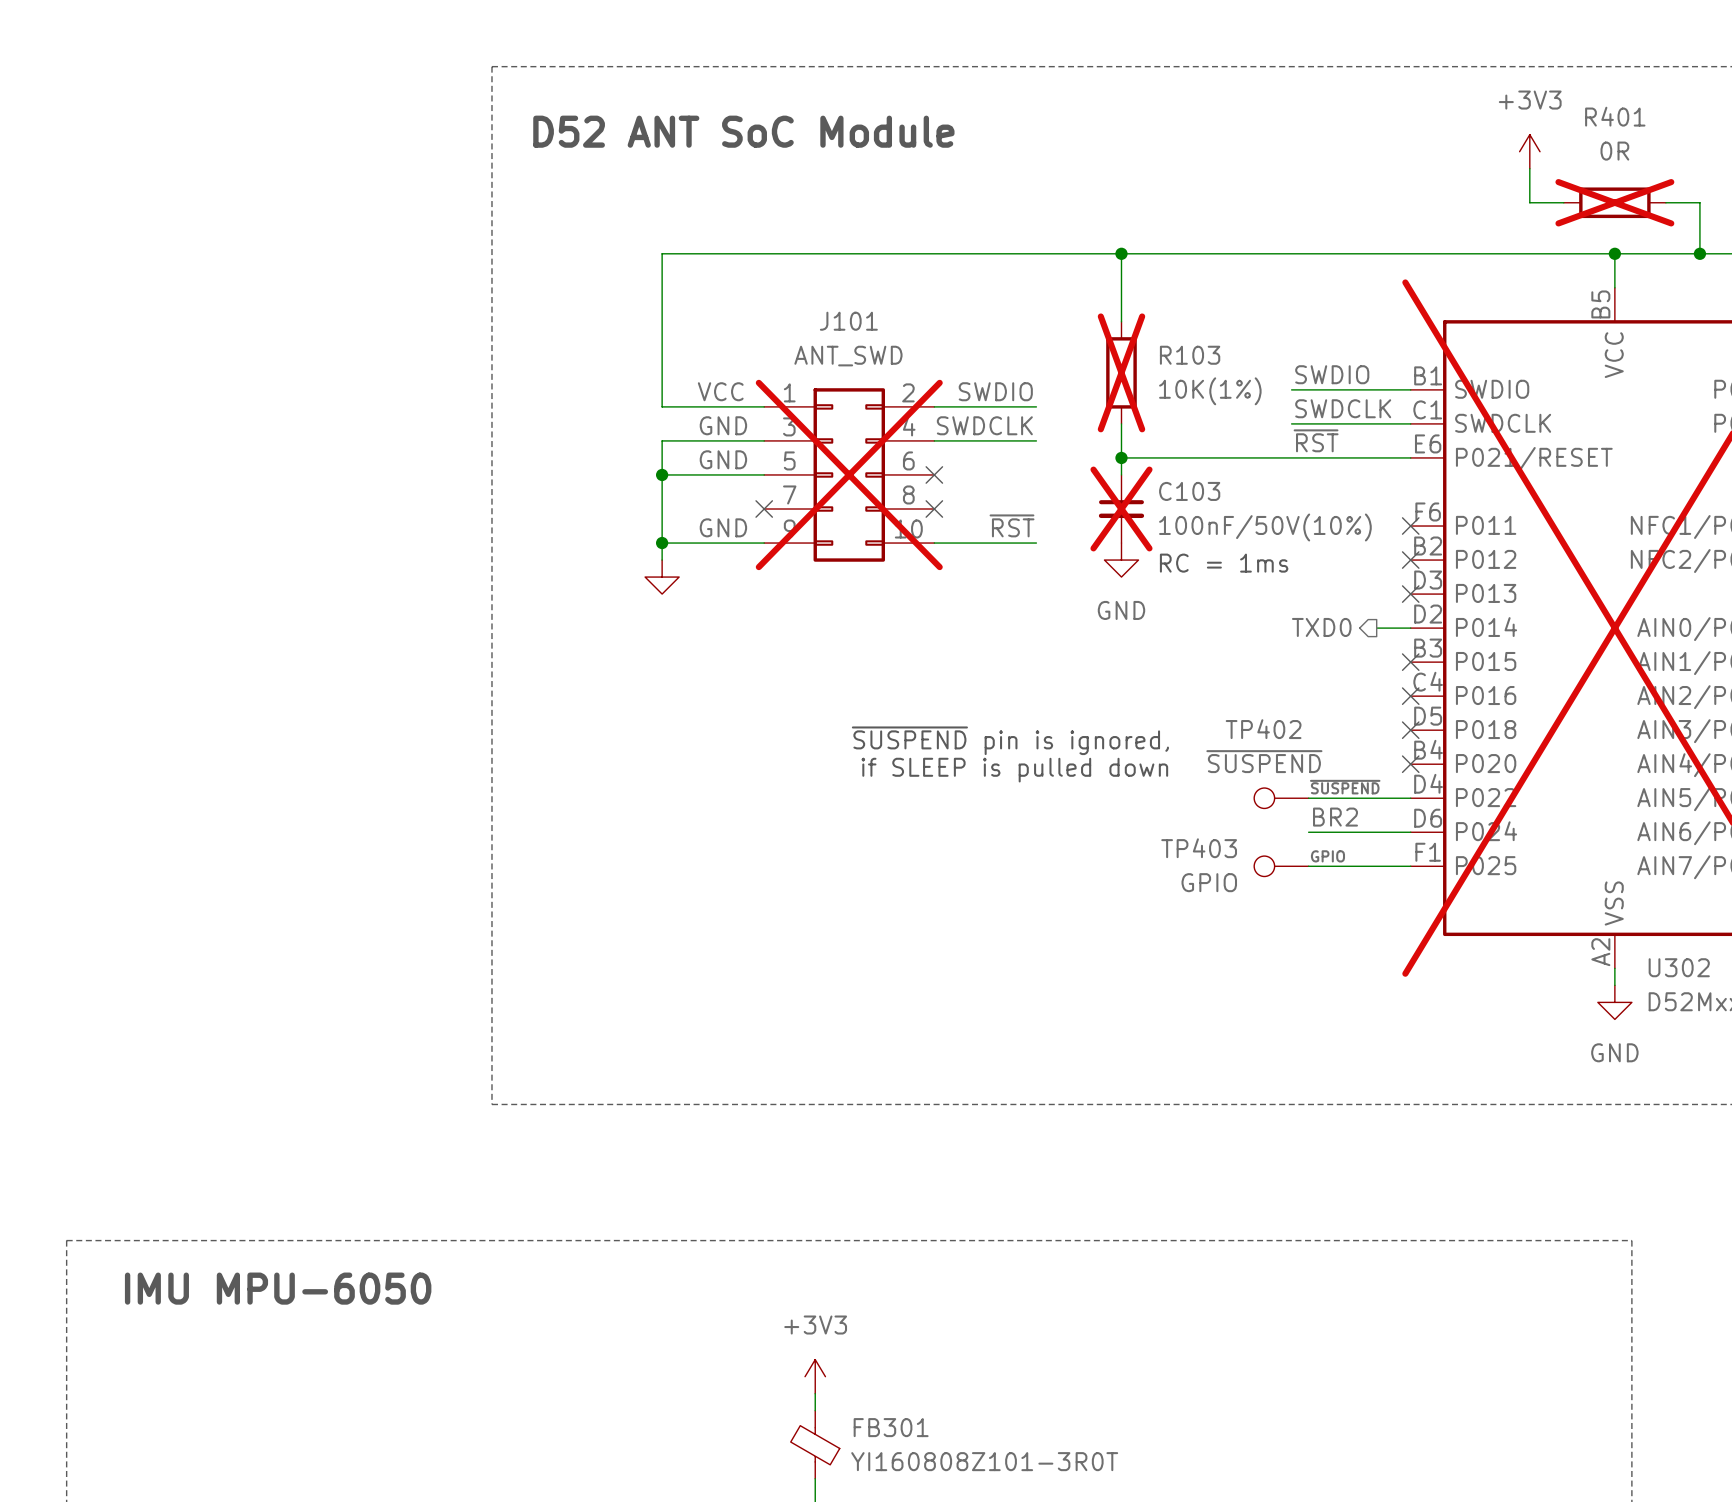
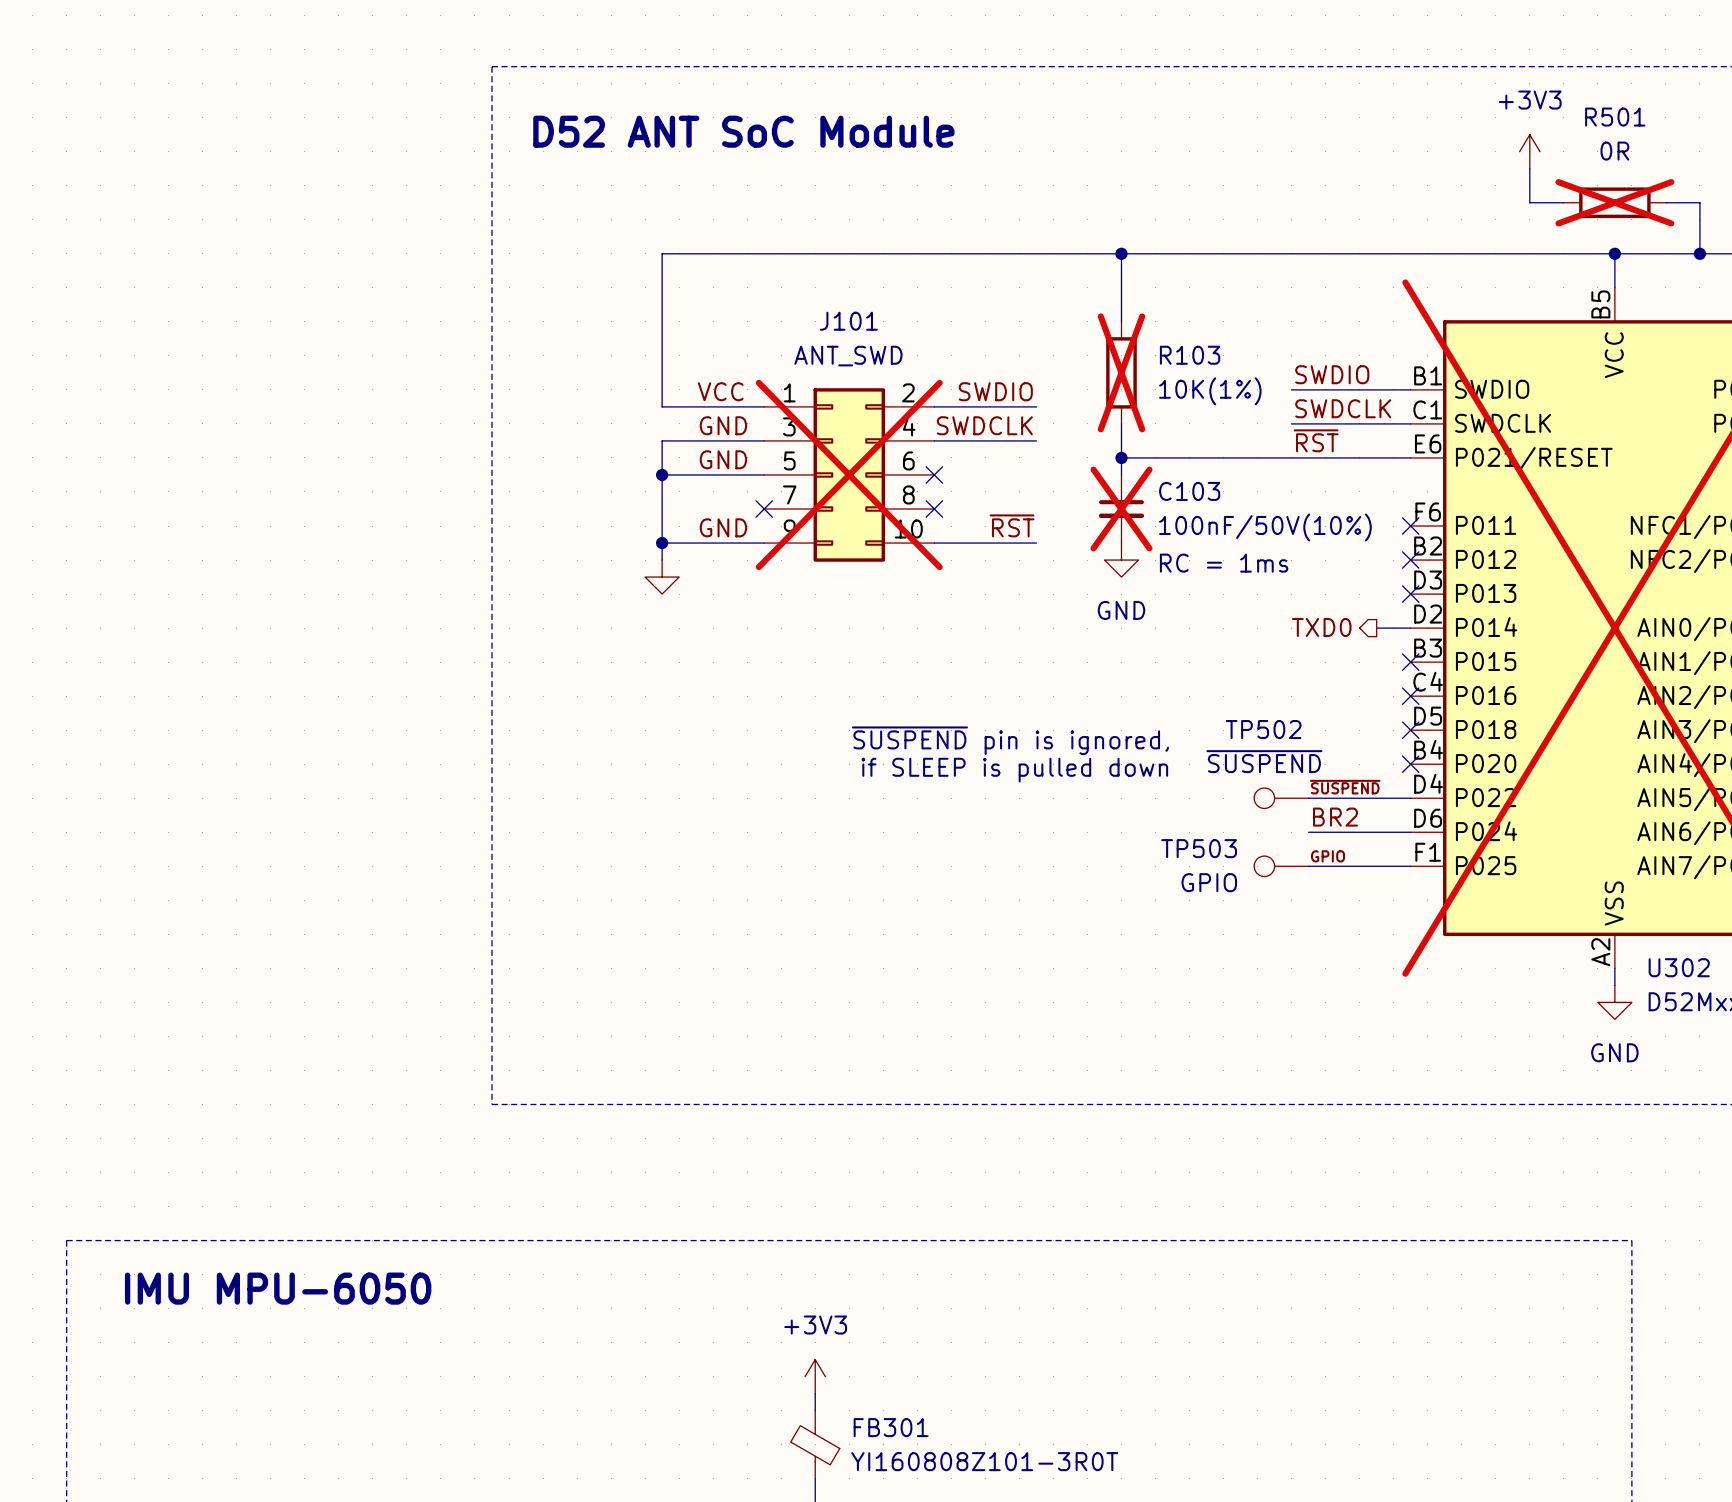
R401 name: R401 (1615, 116) -> R501 (1615, 117)
TP402 name: TP402 (1263, 729) -> TP502 (1263, 729)
TP403 name: TP403 (1199, 848) -> TP503 (1199, 848)

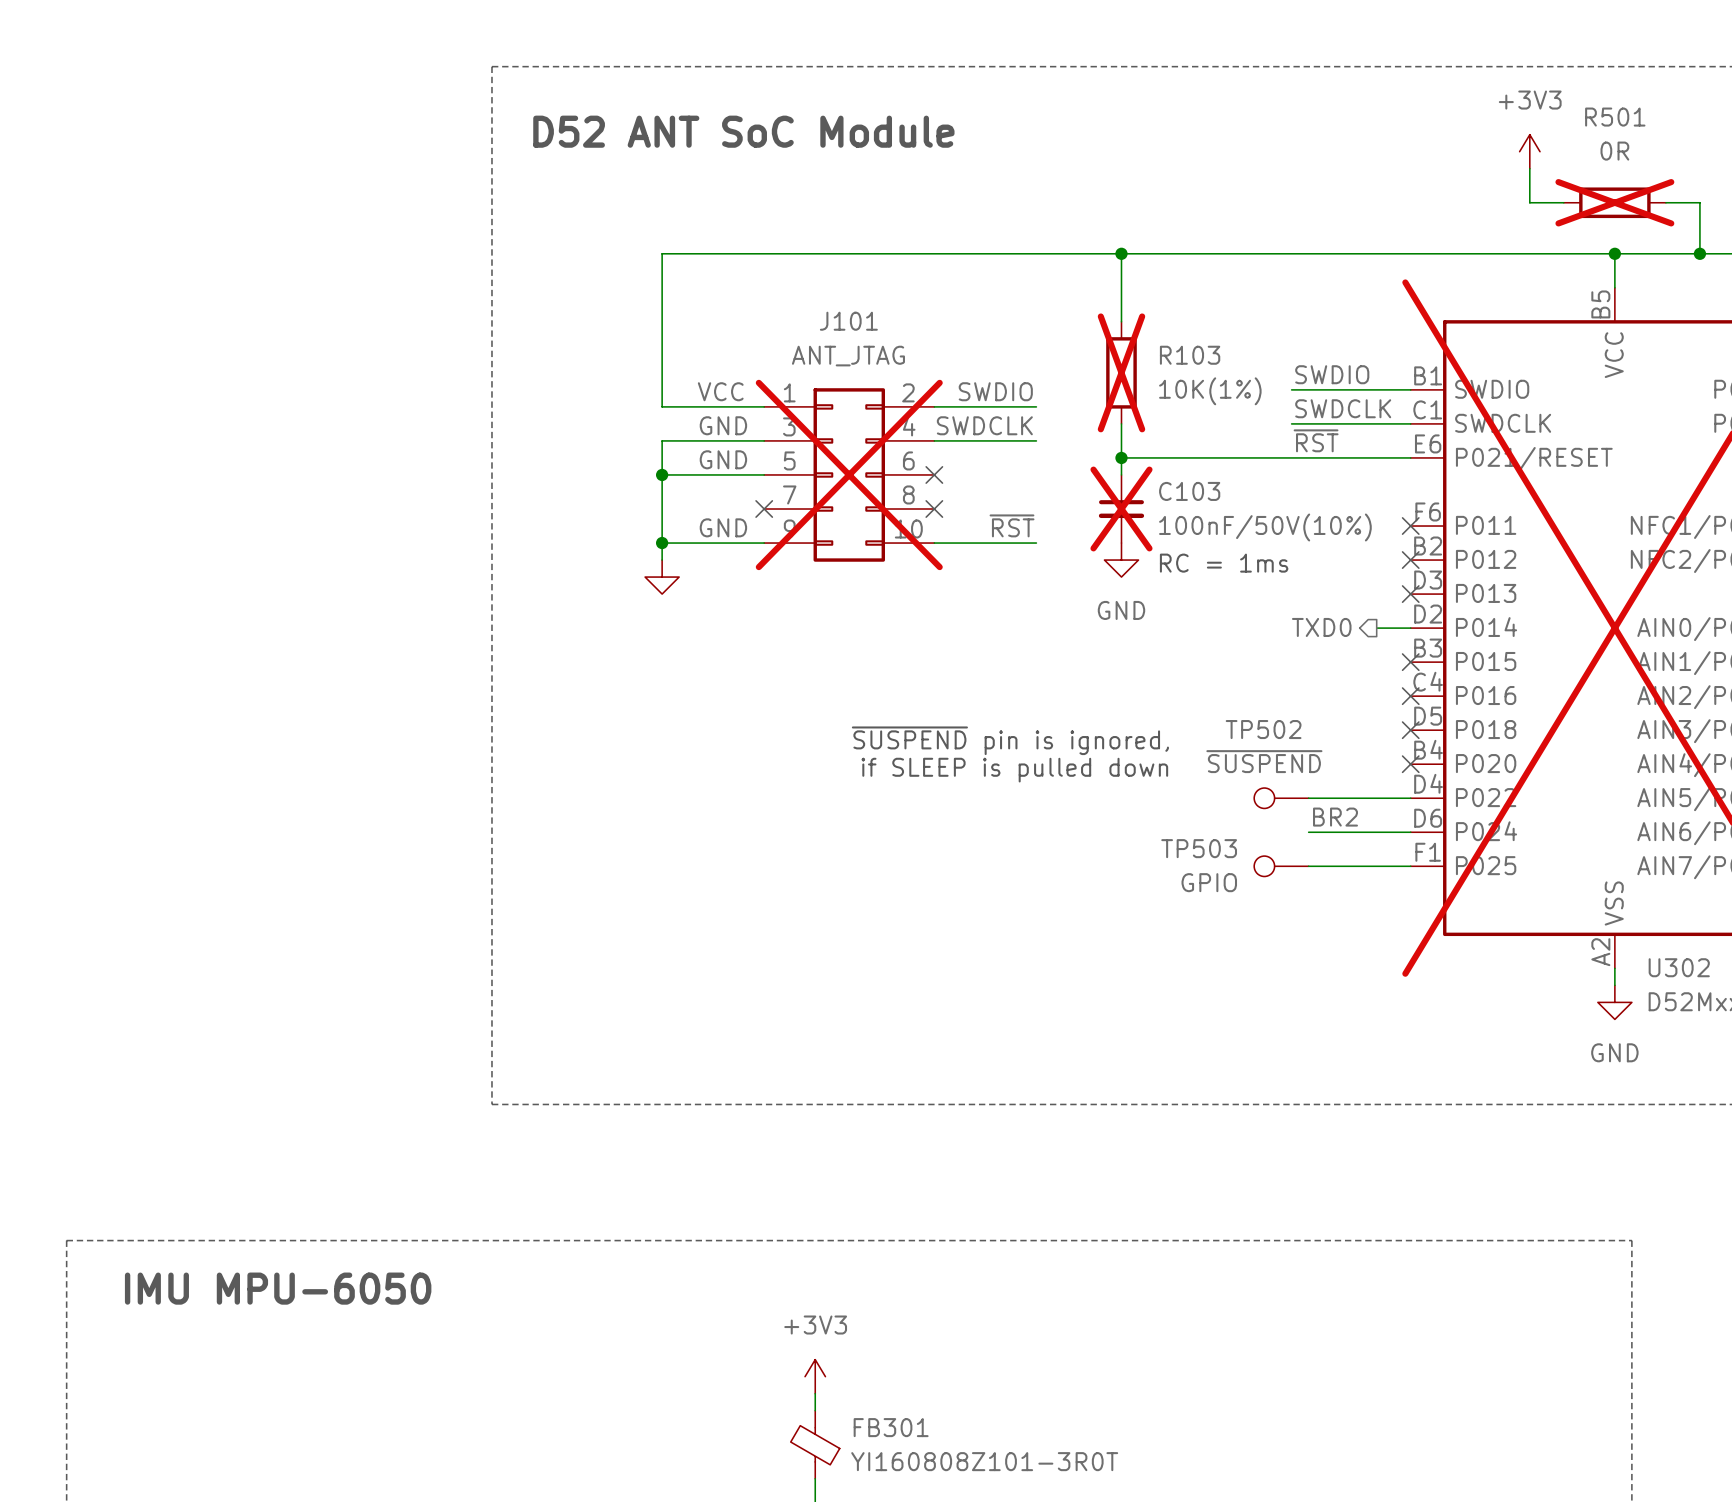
J101 value: ANT_SWD (848, 356) -> ANT_JTAG (848, 356)
label: ~{SUSPEND} (1345, 787) -> none
label: GPIO (1327, 856) -> none

